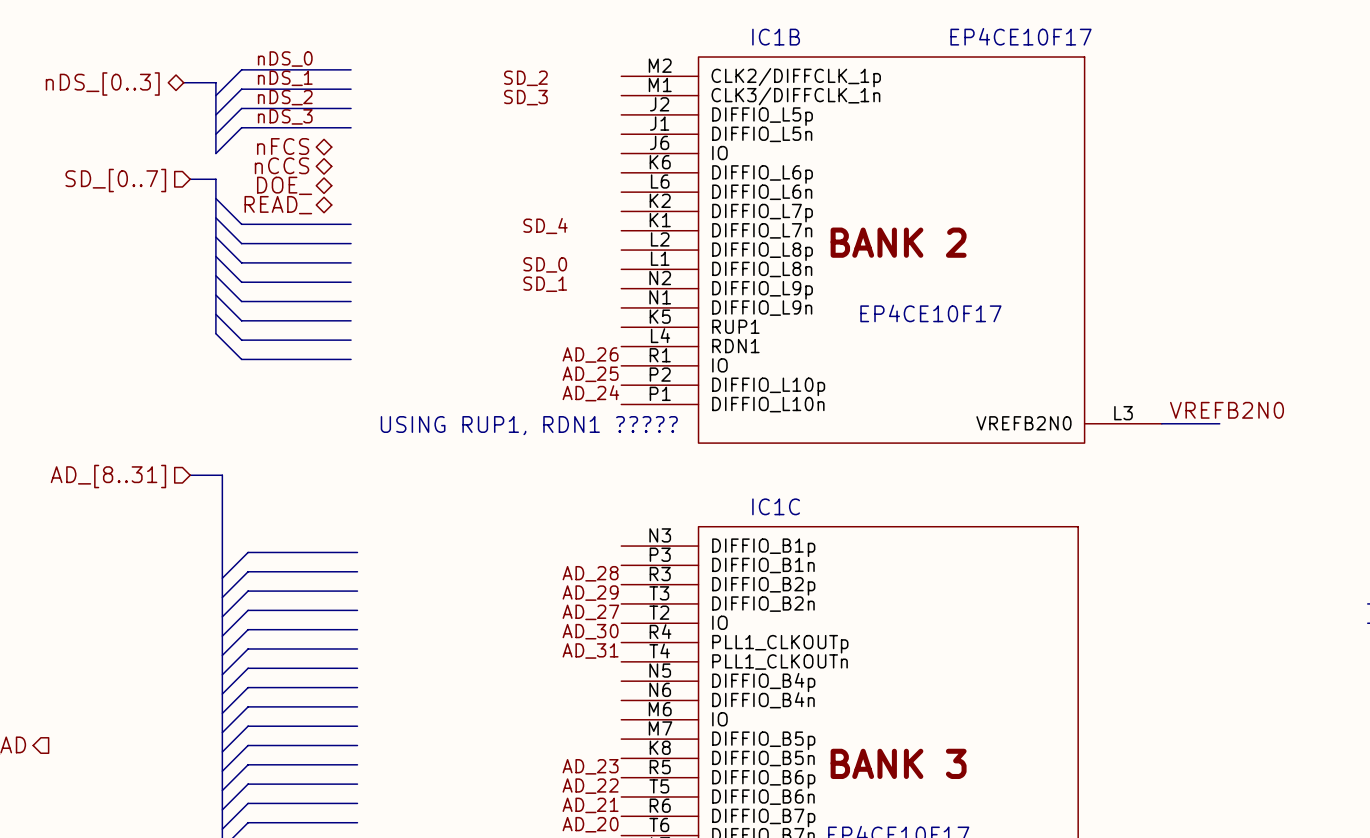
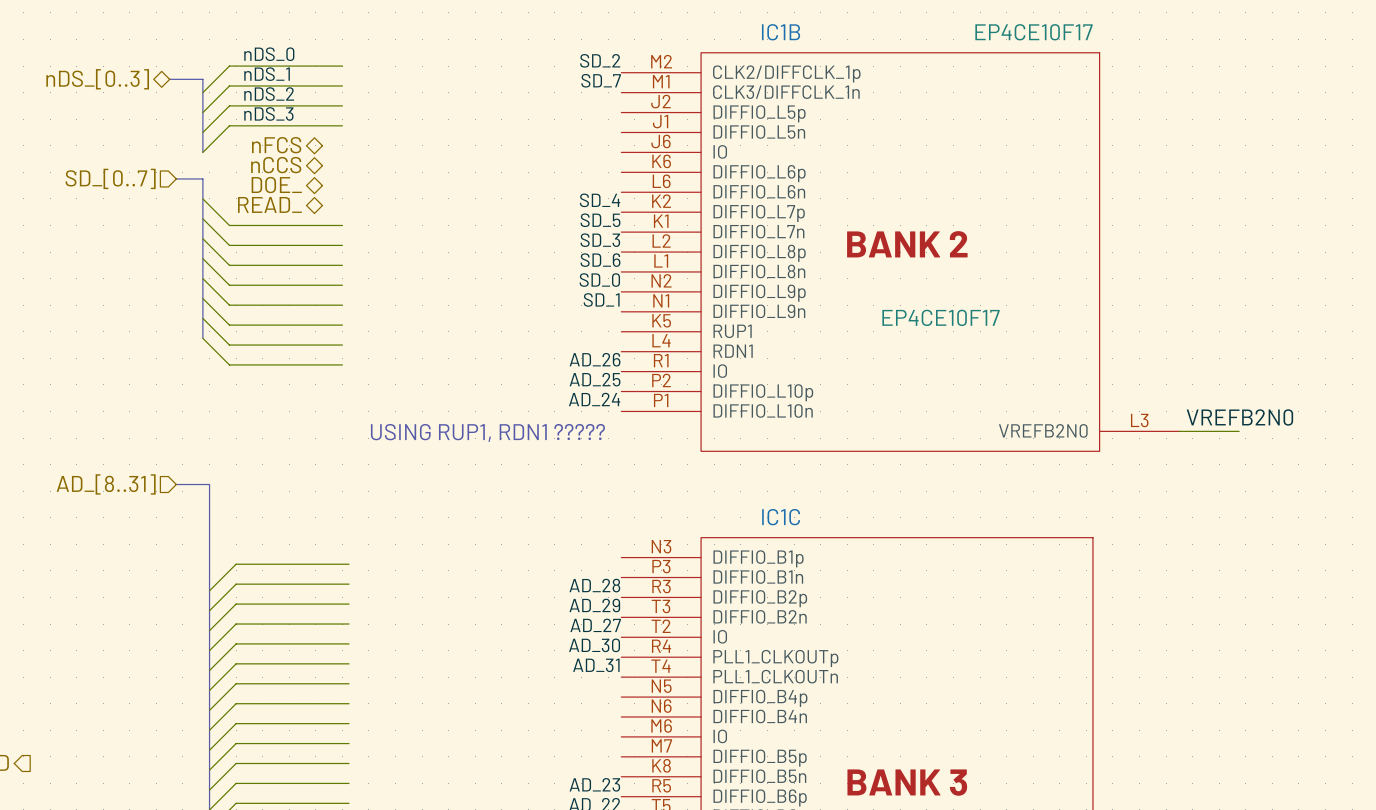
label position: SD_2 (525, 78) -> SD_2 (600, 60)
label: none -> SD_7 (601, 80)
label position: SD_3 (525, 97) -> SD_3 (600, 240)
label: none -> SD_5 (600, 220)
label position: SD_4 (545, 225) -> SD_4 (600, 200)
label: none -> SD_6 (600, 260)
label position: SD_0 (545, 264) -> SD_0 (599, 280)
label position: SD_1 (545, 284) -> SD_1 (601, 299)

